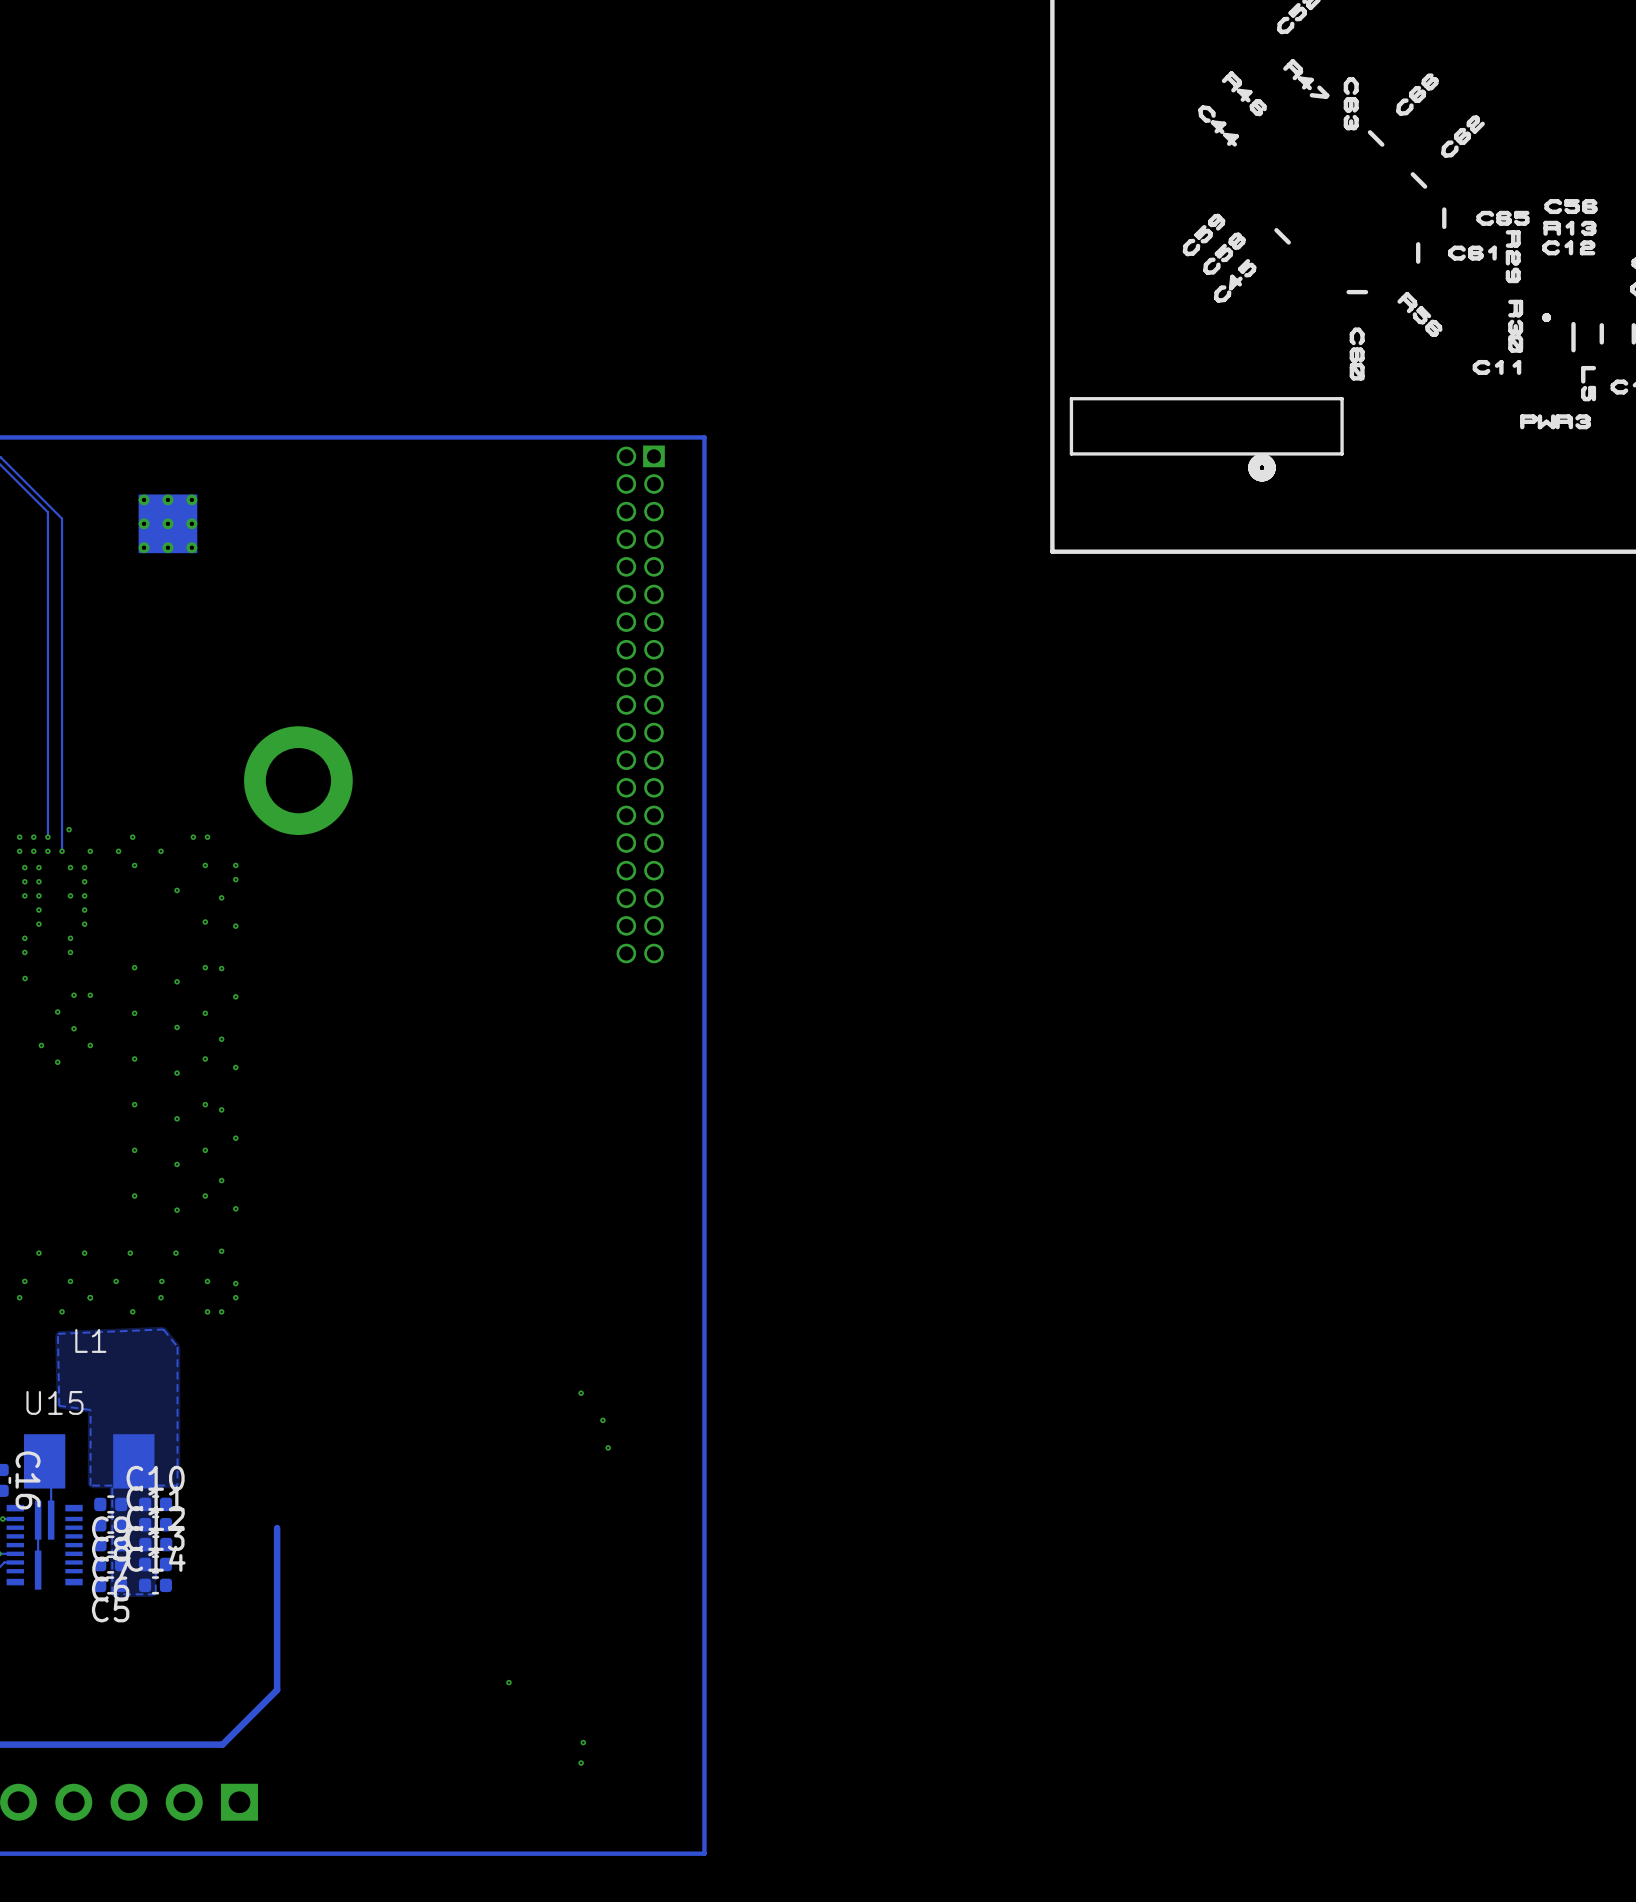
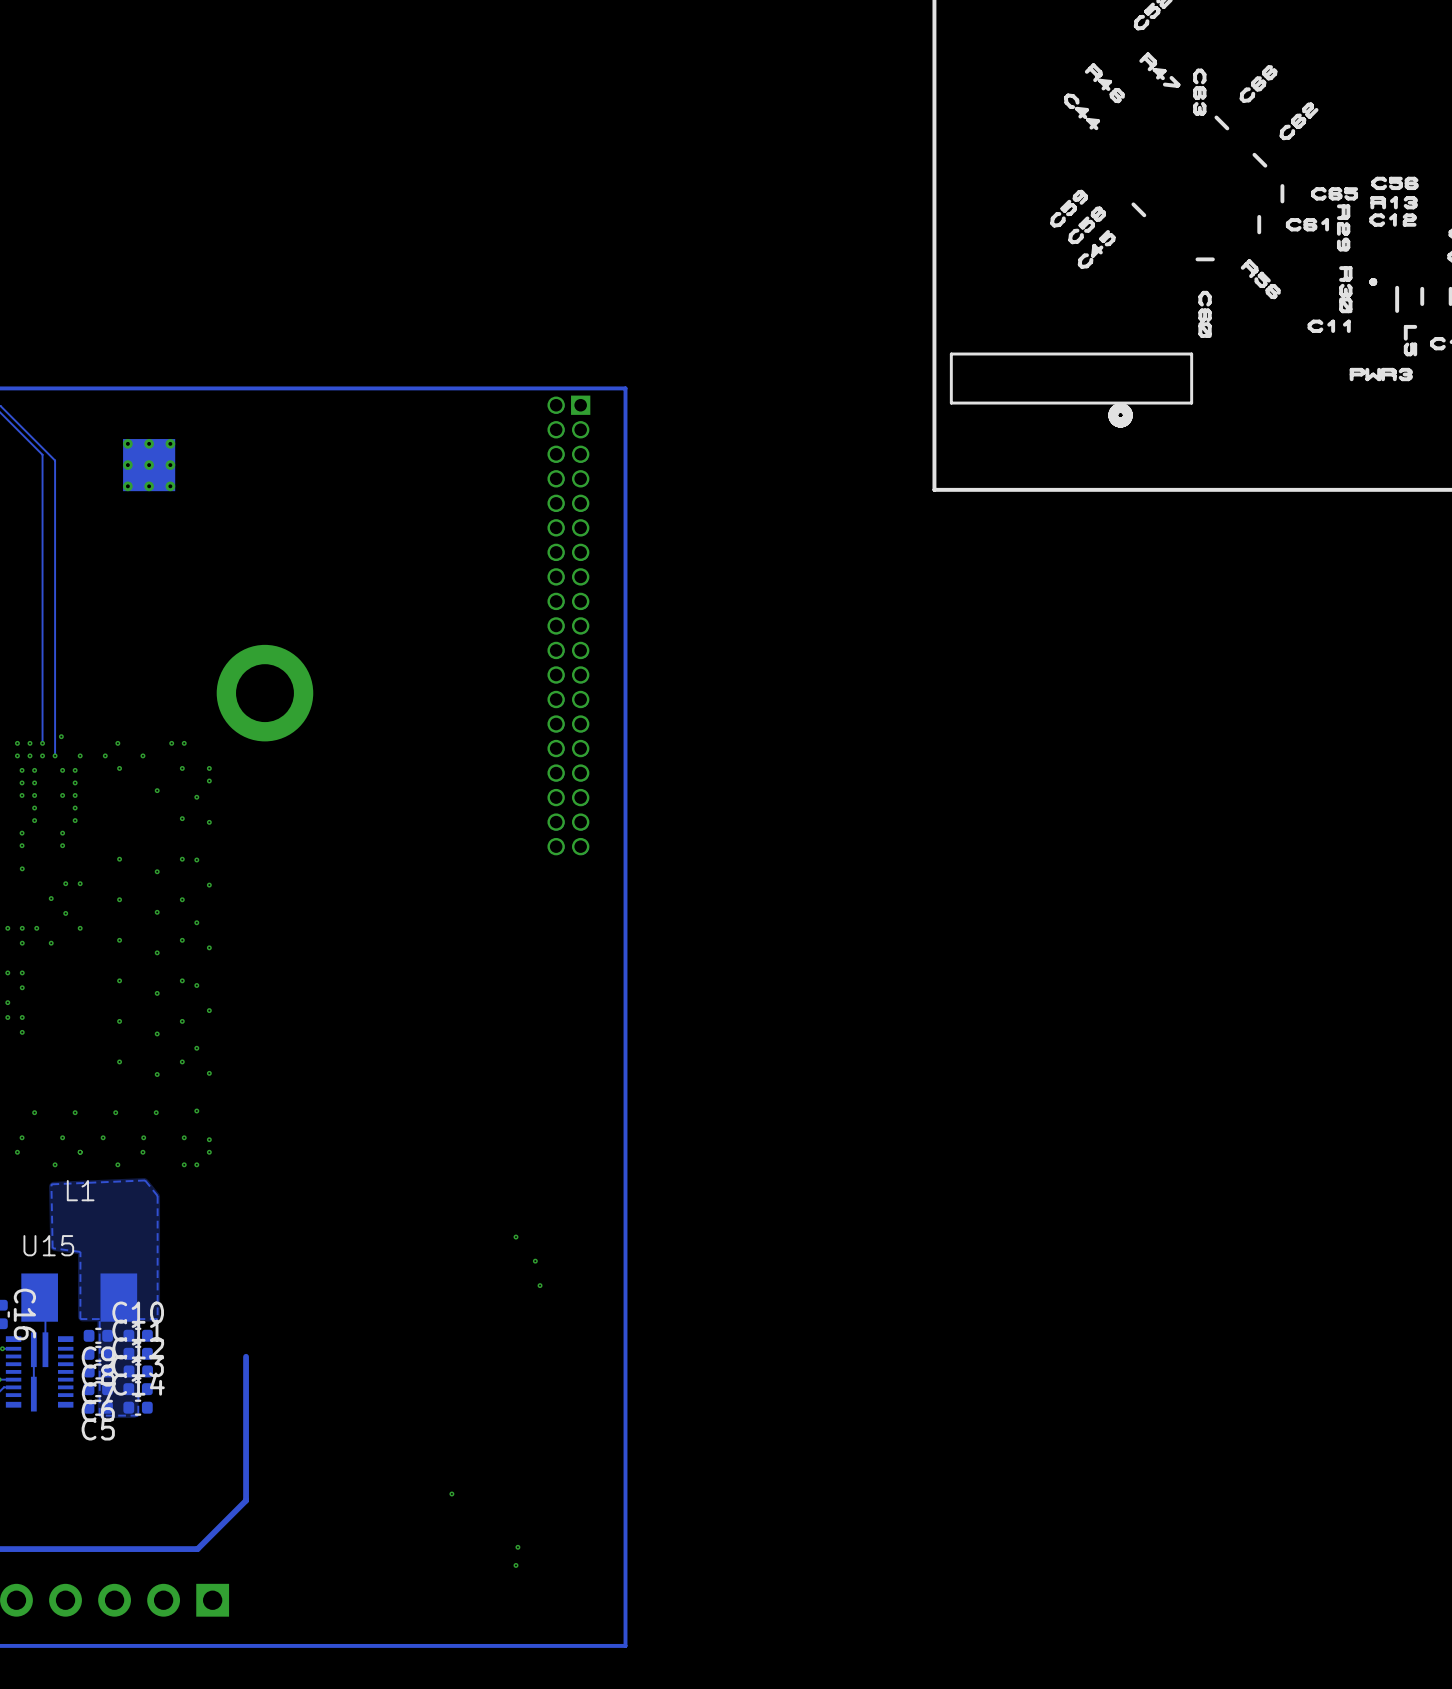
via: none -> (7, 928)
via: none -> (22, 928)
via: none -> (22, 943)
via: none -> (7, 972)
via: none -> (22, 972)
via: none -> (22, 987)
via: none -> (7, 1002)
via: none -> (7, 1017)
via: none -> (22, 1017)
via: none -> (22, 1032)

